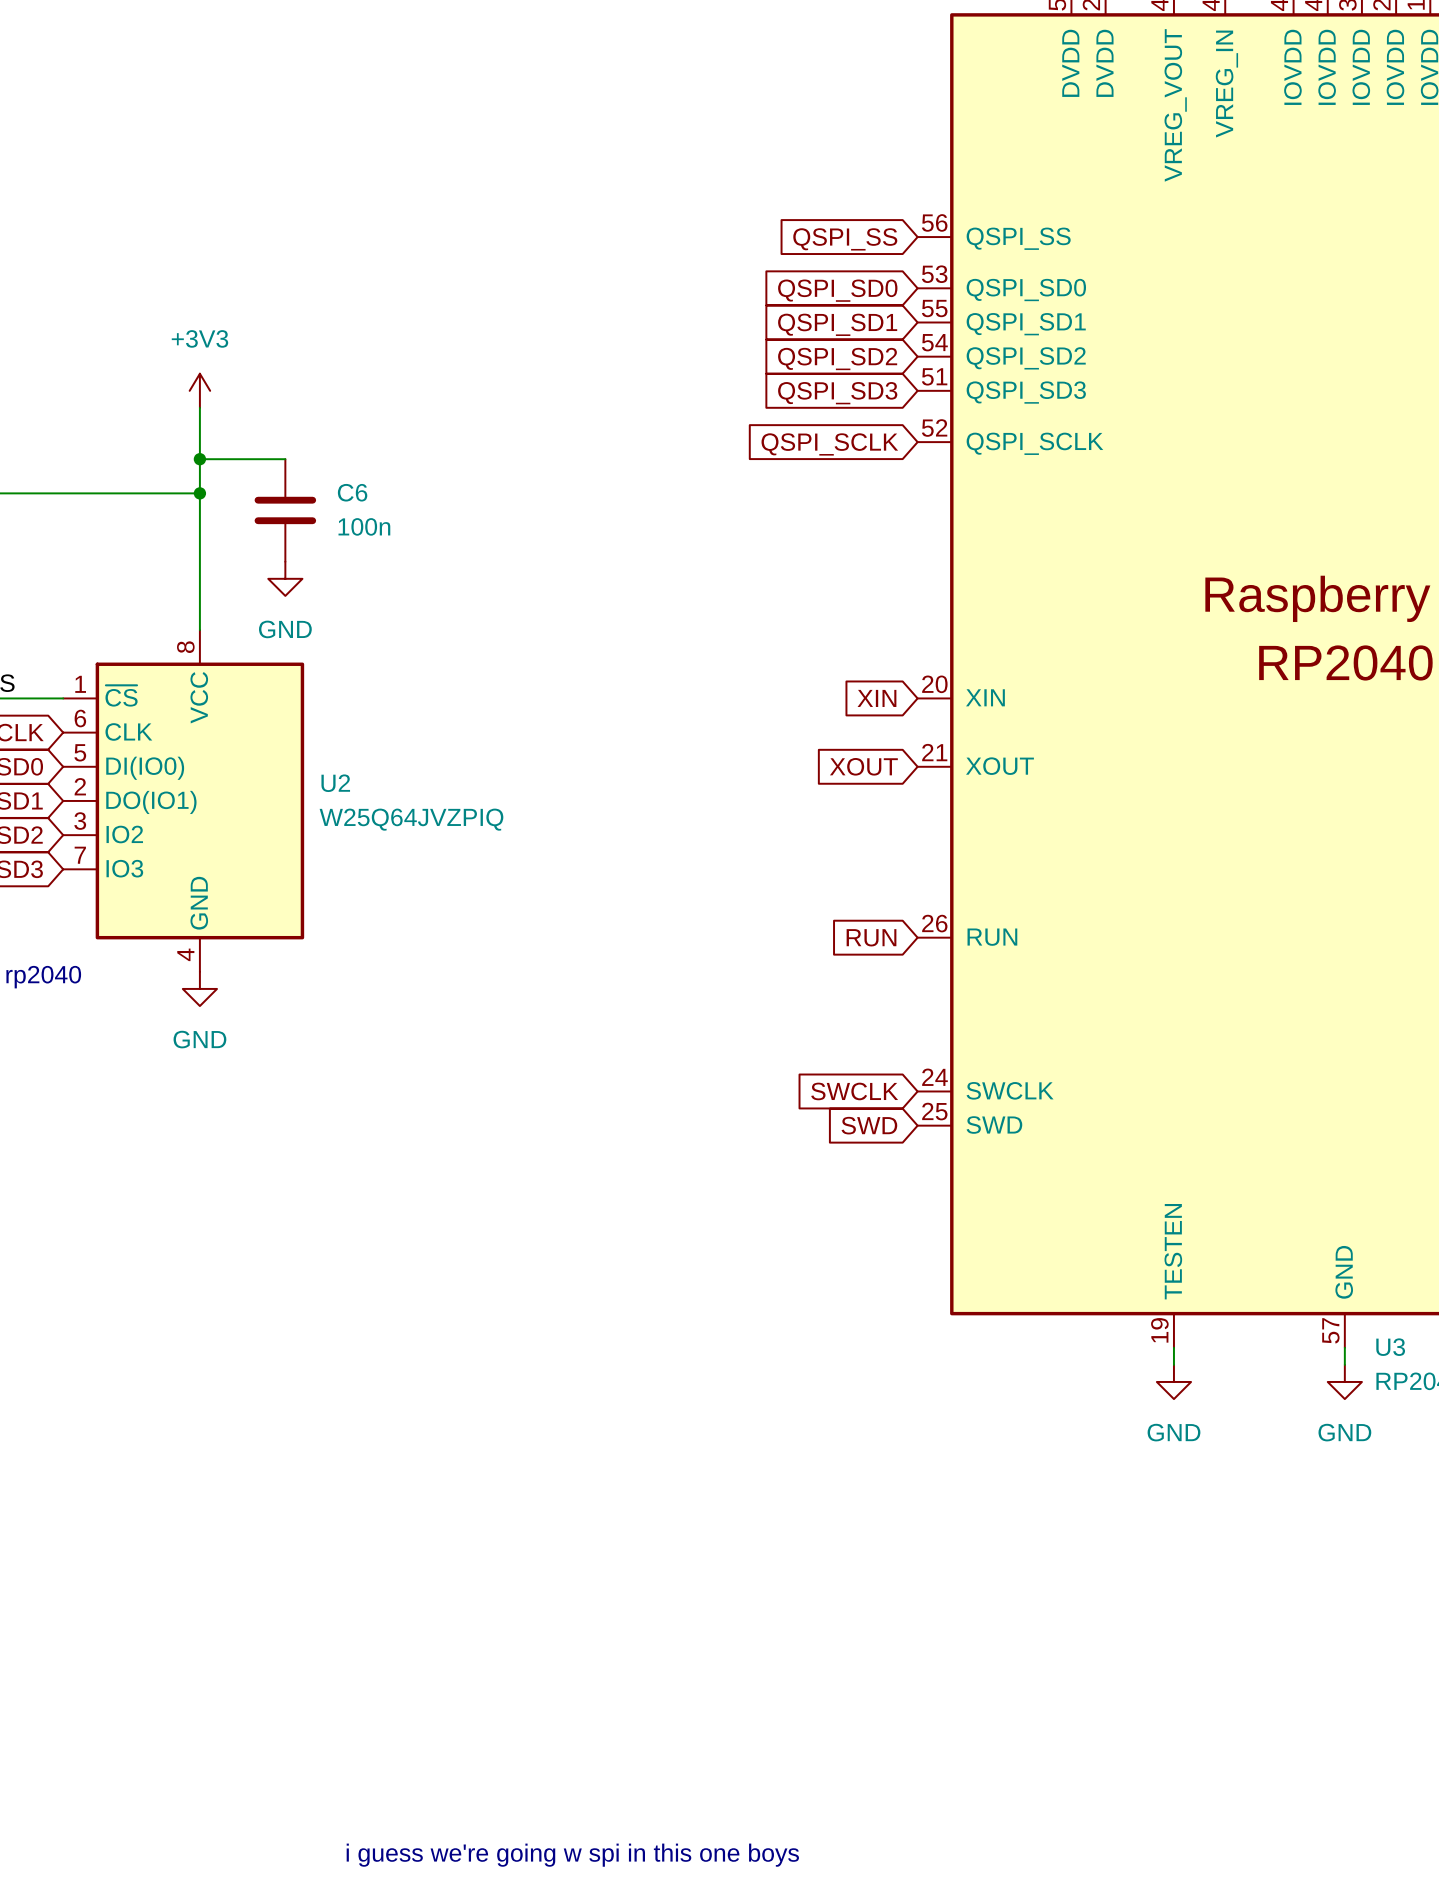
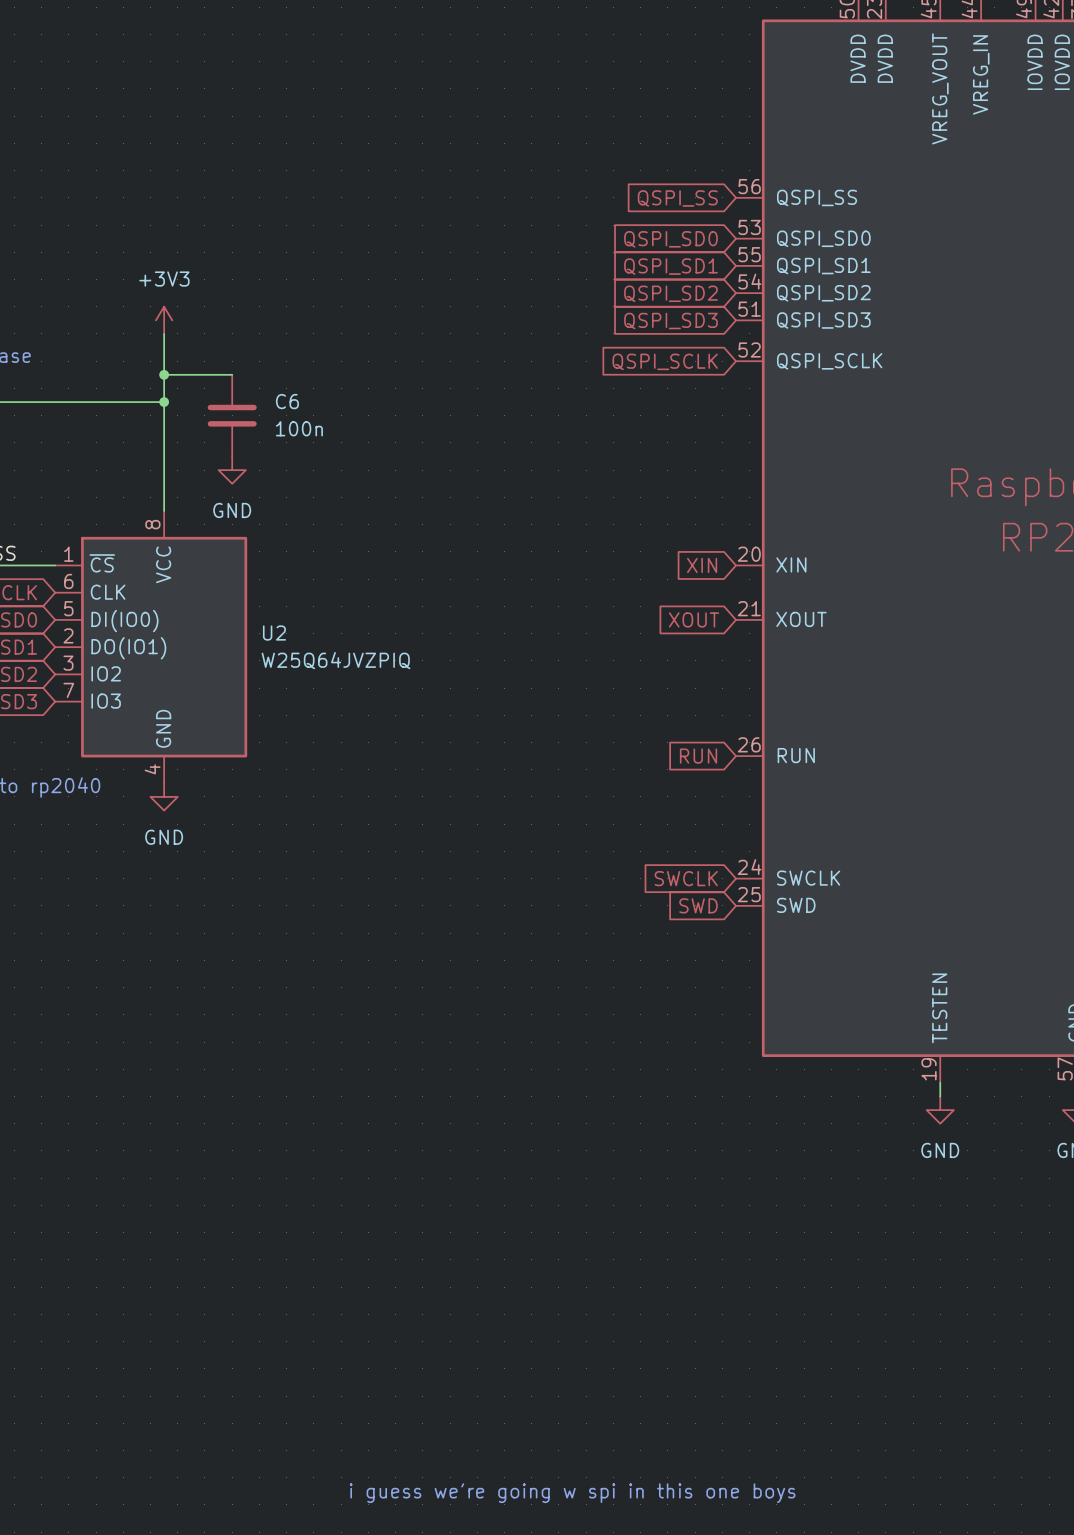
text position: i guess we're going w spi in this one boys (572, 1855) -> i guess we're going w spi in this one boys (572, 1493)

